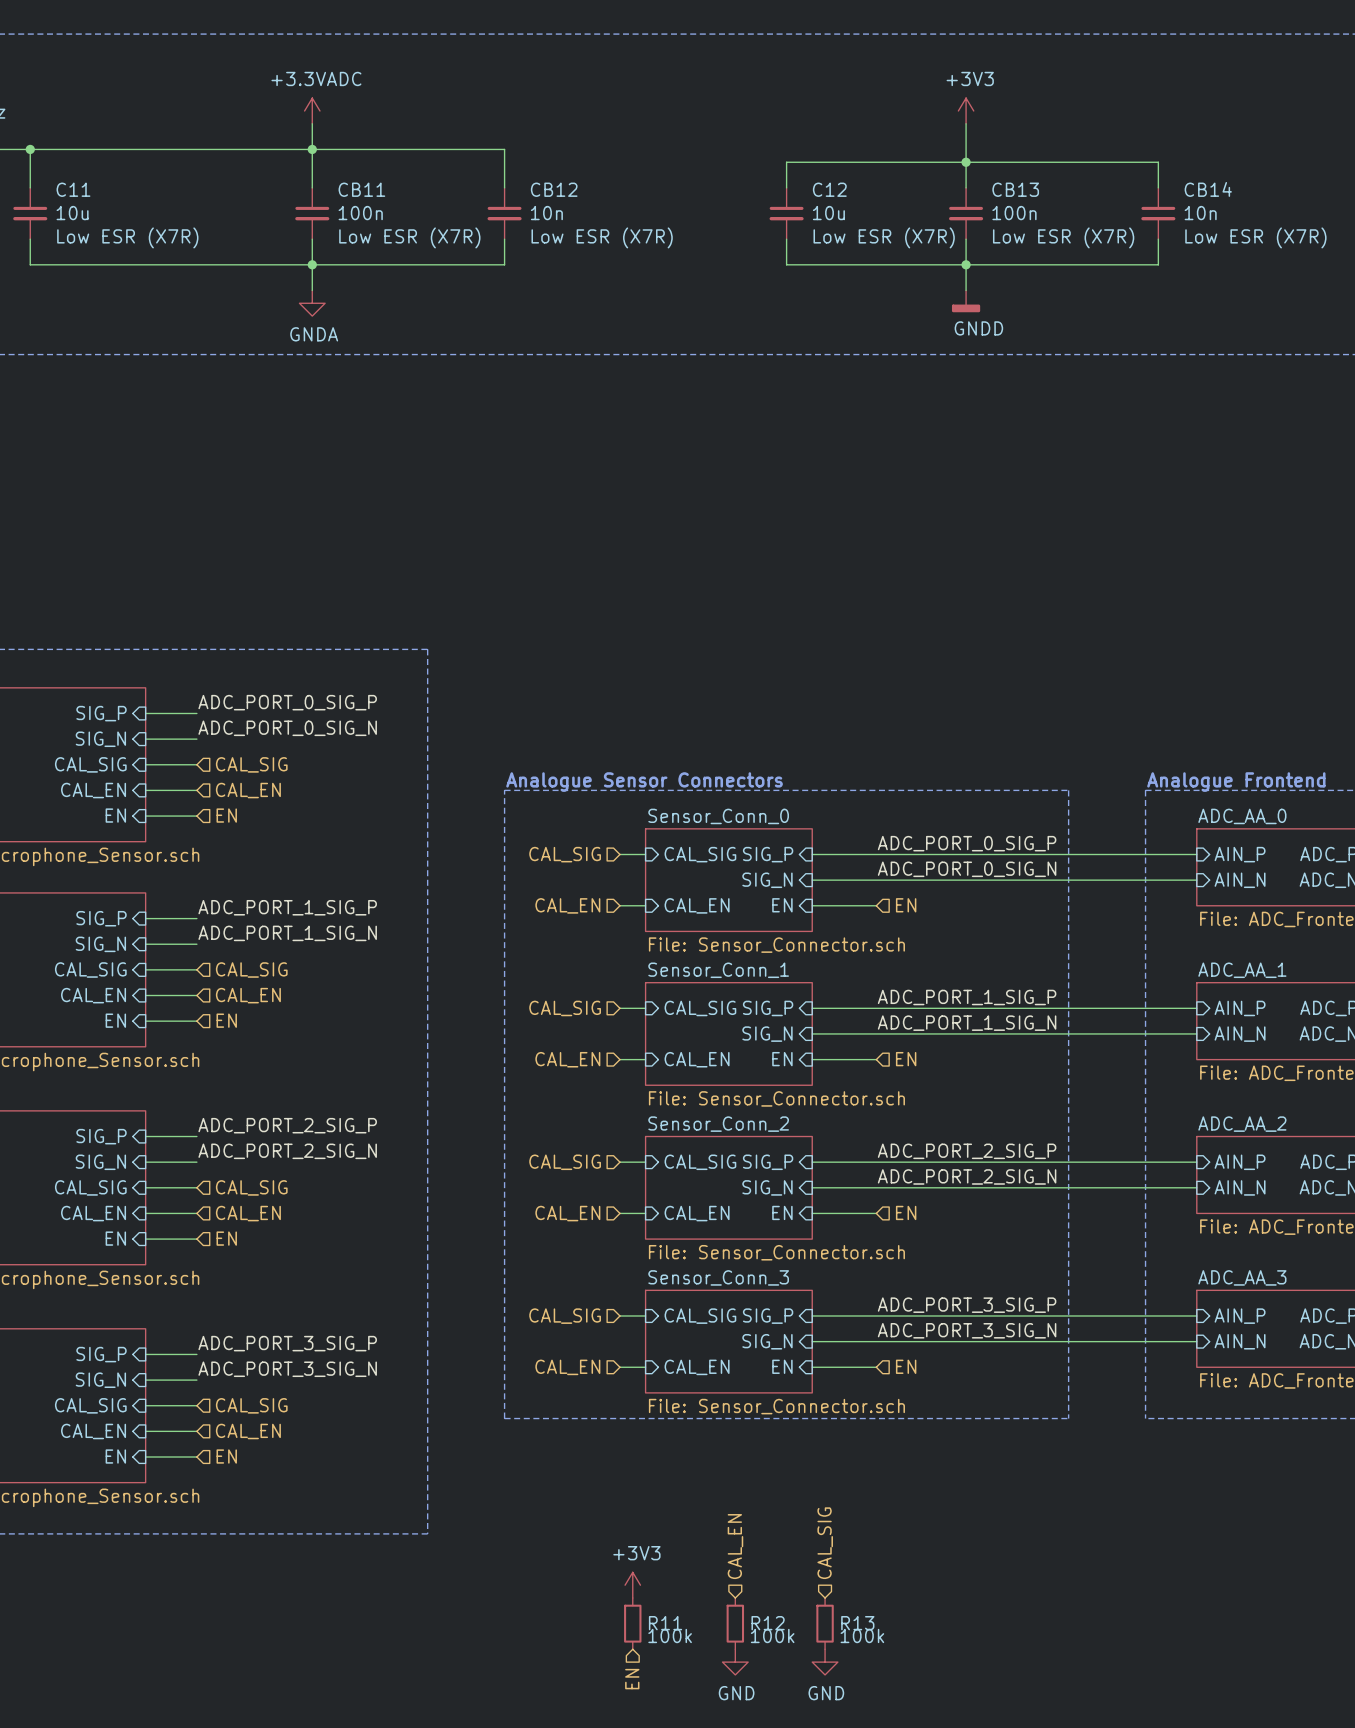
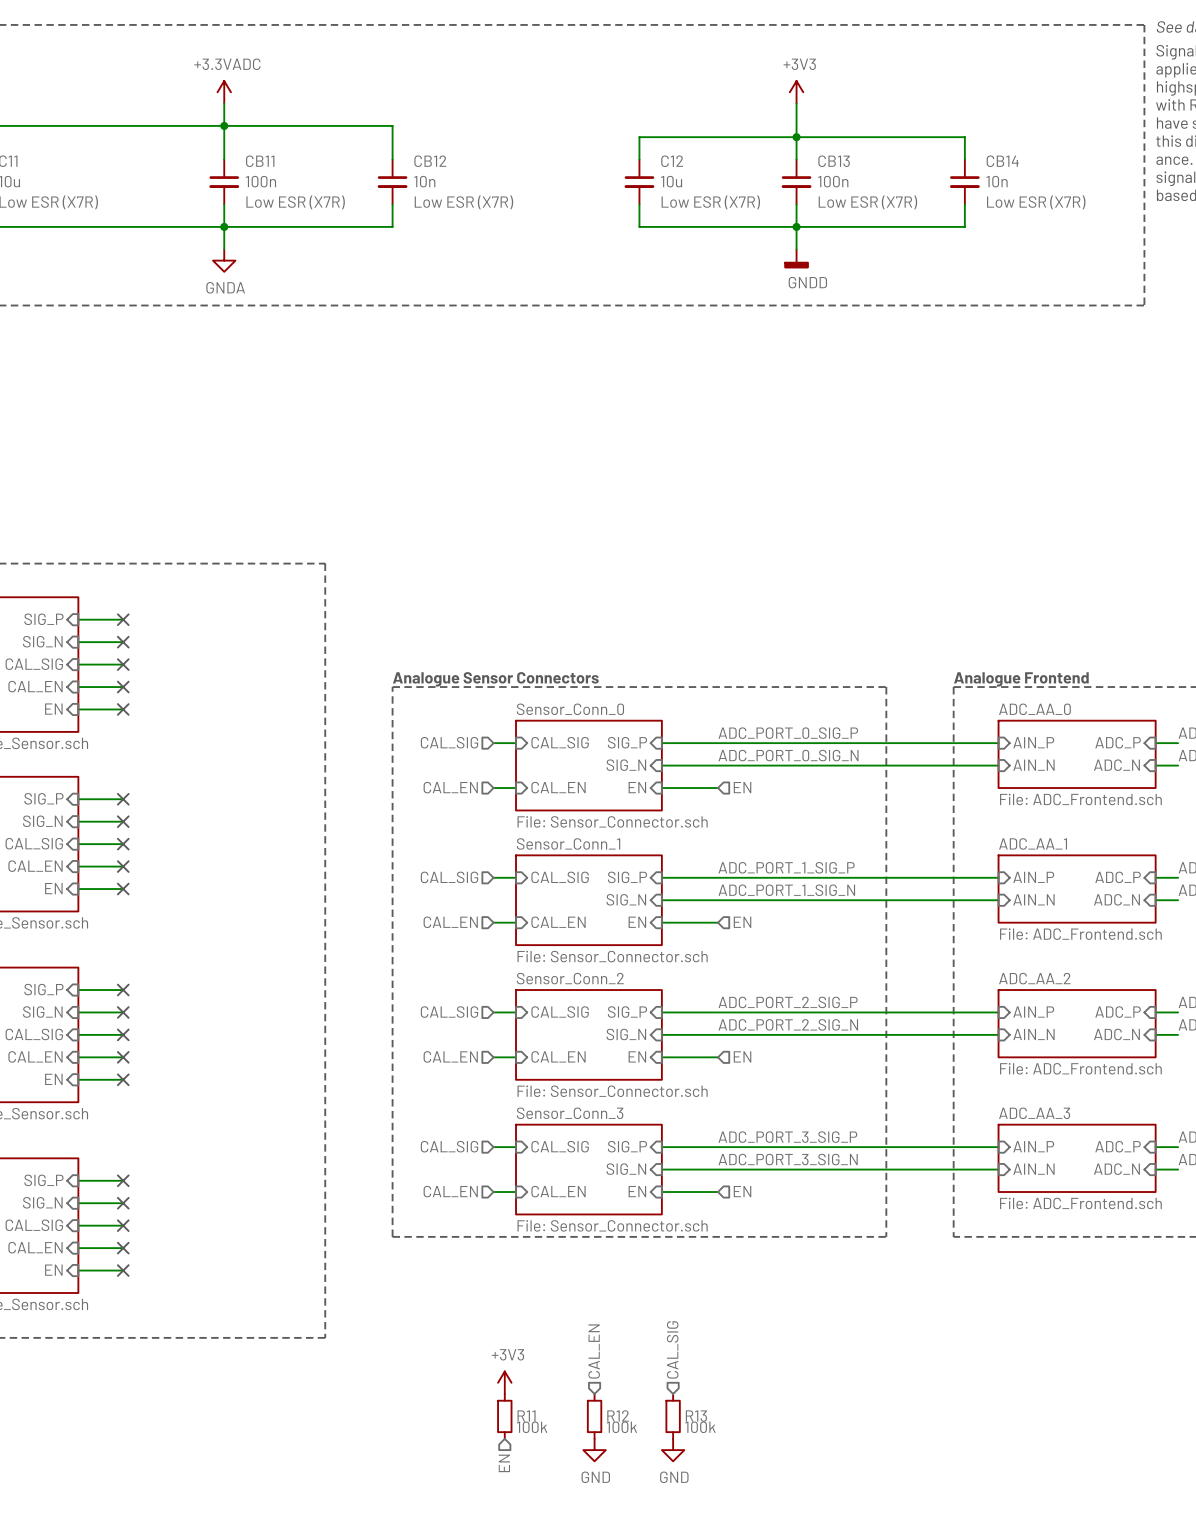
label: ADC_PORT_0_SIG_P (287, 702) -> none
no-connect mark: none -> (123, 619)
label: ADC_PORT_0_SIG_N (287, 728) -> none
no-connect mark: none -> (123, 642)
no-connect mark: none -> (123, 664)
hierarchical label: CAL_SIG (251, 764) -> none
no-connect mark: none -> (123, 687)
hierarchical label: CAL_EN (248, 790) -> none
hierarchical label: EN (226, 815) -> none
no-connect mark: none -> (123, 709)
label: ADC_PORT_1_SIG_P (287, 907) -> none
no-connect mark: none -> (123, 799)
label: ADC_PORT_1_SIG_N (287, 933) -> none
no-connect mark: none -> (123, 821)
no-connect mark: none -> (123, 844)
hierarchical label: CAL_SIG (251, 970) -> none
no-connect mark: none -> (123, 866)
hierarchical label: CAL_EN (248, 995) -> none
hierarchical label: EN (226, 1020) -> none
no-connect mark: none -> (123, 889)
label: ADC_PORT_2_SIG_P (287, 1125) -> none
no-connect mark: none -> (123, 990)
label: ADC_PORT_2_SIG_N (287, 1151) -> none
no-connect mark: none -> (123, 1012)
no-connect mark: none -> (123, 1034)
hierarchical label: CAL_SIG (251, 1187) -> none
no-connect mark: none -> (123, 1057)
hierarchical label: CAL_EN (248, 1213) -> none
hierarchical label: EN (226, 1238) -> none
no-connect mark: none -> (123, 1079)
label: ADC_PORT_3_SIG_P (287, 1343) -> none
no-connect mark: none -> (123, 1180)
label: ADC_PORT_3_SIG_N (287, 1369) -> none
no-connect mark: none -> (123, 1203)
no-connect mark: none -> (123, 1225)
hierarchical label: CAL_SIG (251, 1405) -> none
no-connect mark: none -> (123, 1248)
hierarchical label: CAL_EN (248, 1431) -> none
hierarchical label: EN (226, 1456) -> none
no-connect mark: none -> (123, 1270)

